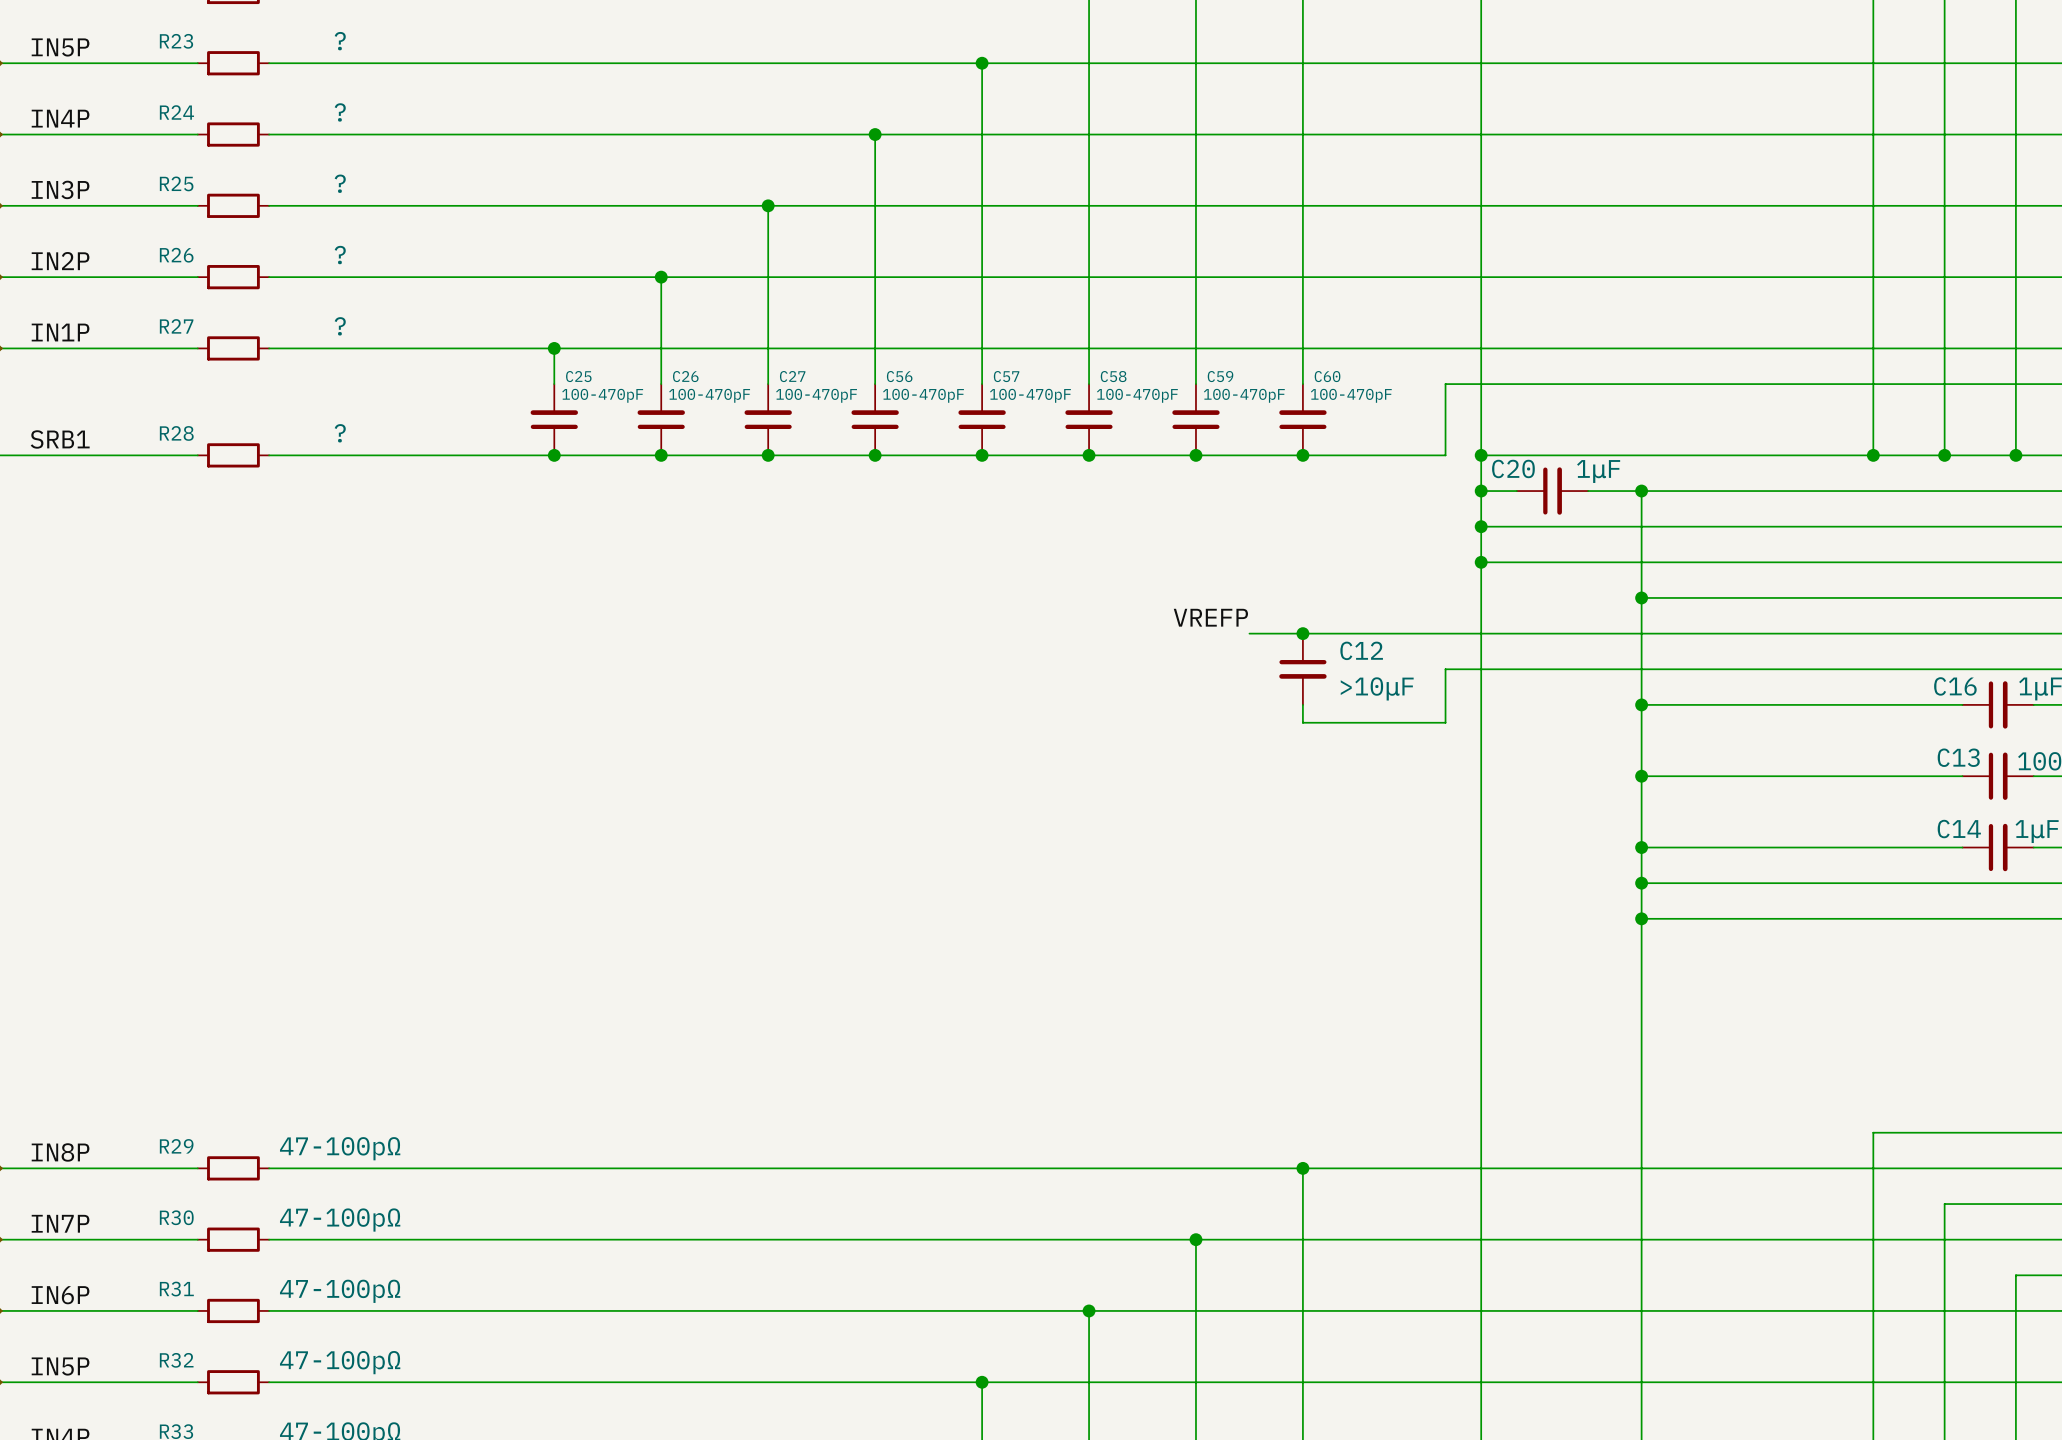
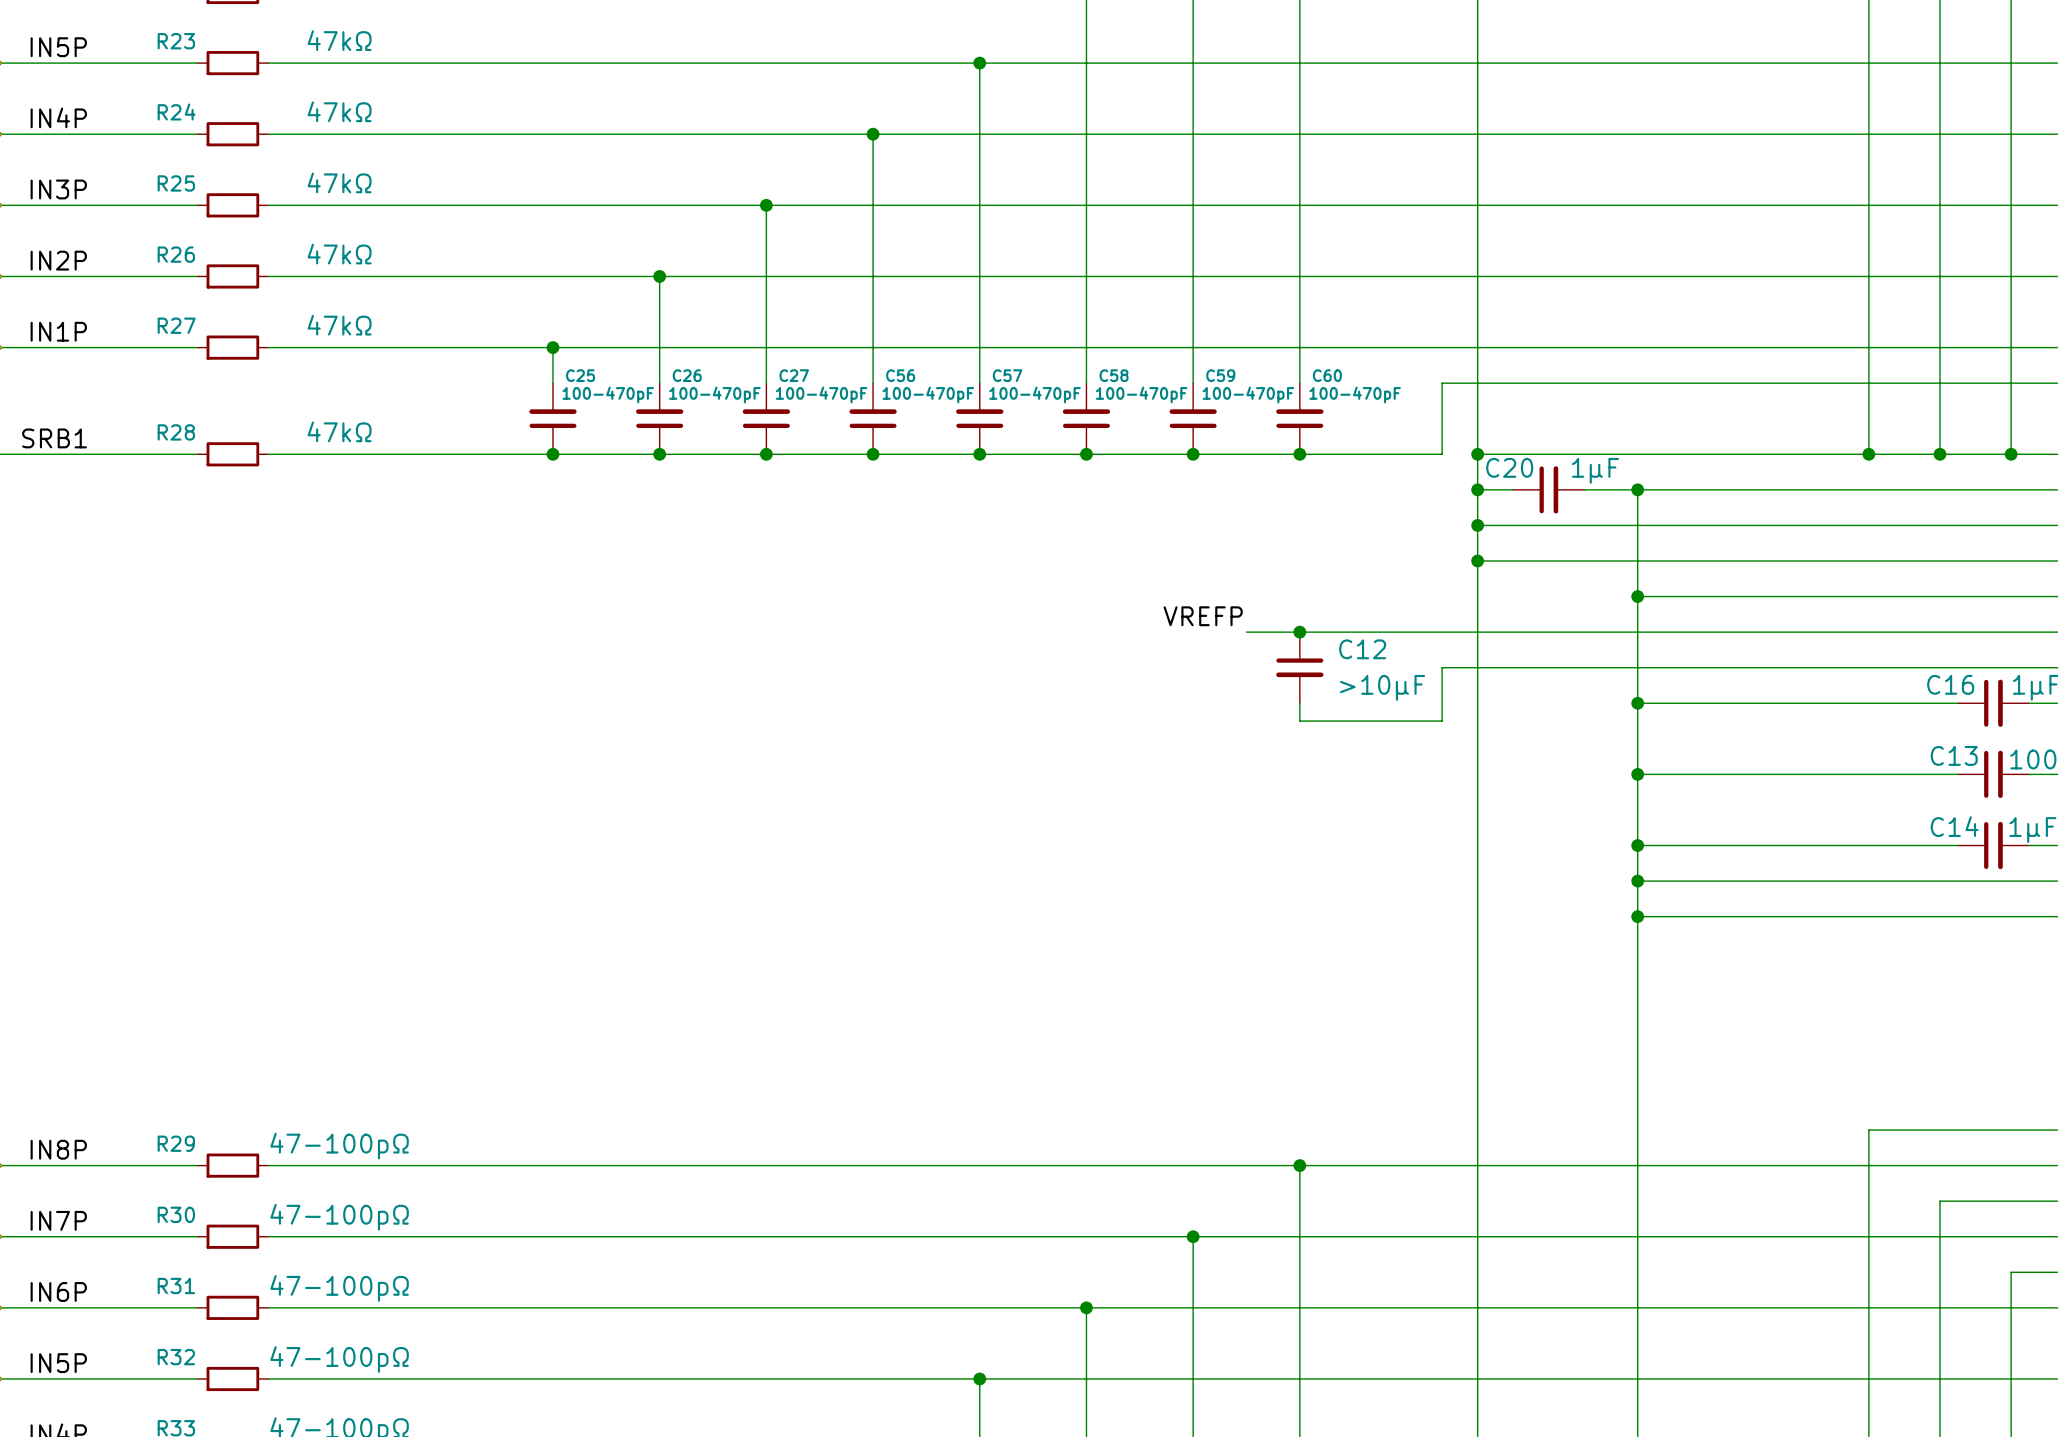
R23 value: ? (340, 41) -> 47kΩ (339, 40)
R24 value: ? (340, 112) -> 47kΩ (339, 111)
R25 value: ? (340, 183) -> 47kΩ (339, 182)
R26 value: ? (340, 255) -> 47kΩ (339, 254)
R27 value: ? (340, 326) -> 47kΩ (339, 325)
R28 value: ? (340, 433) -> 47kΩ (339, 431)

